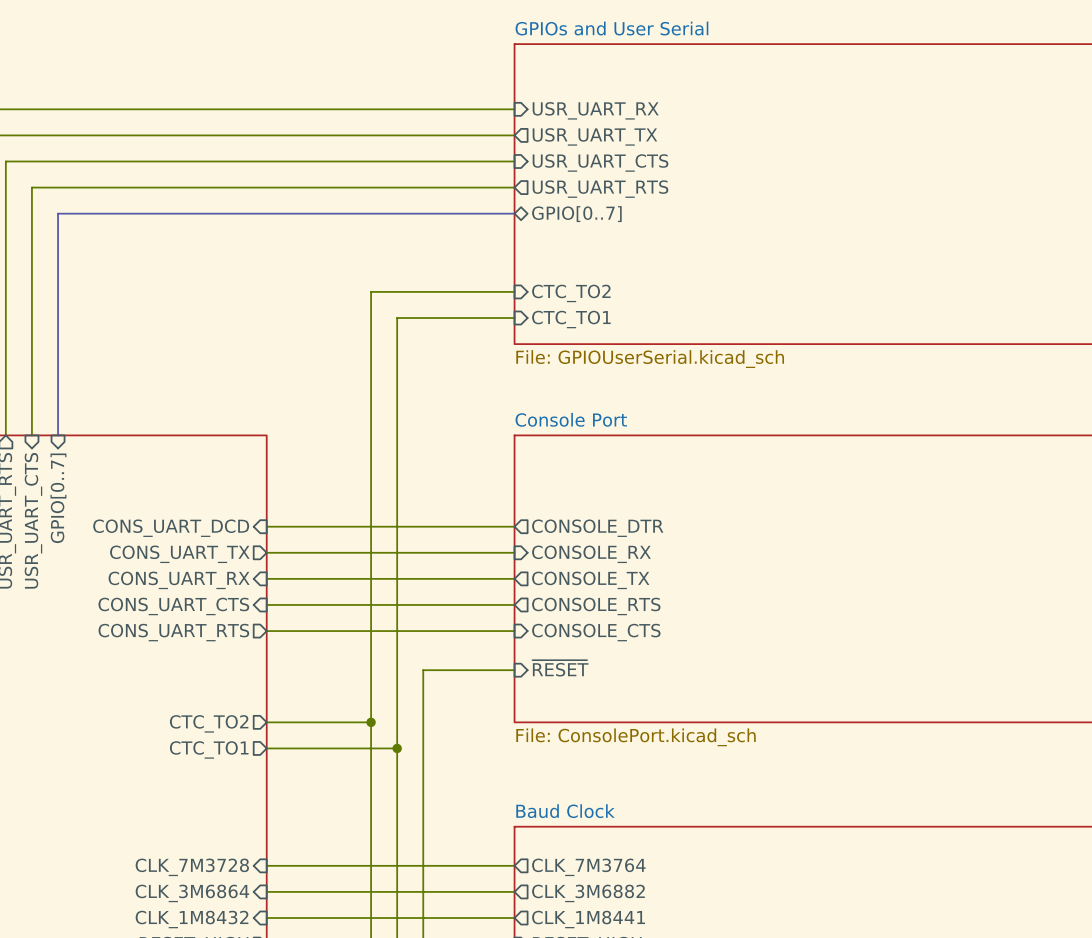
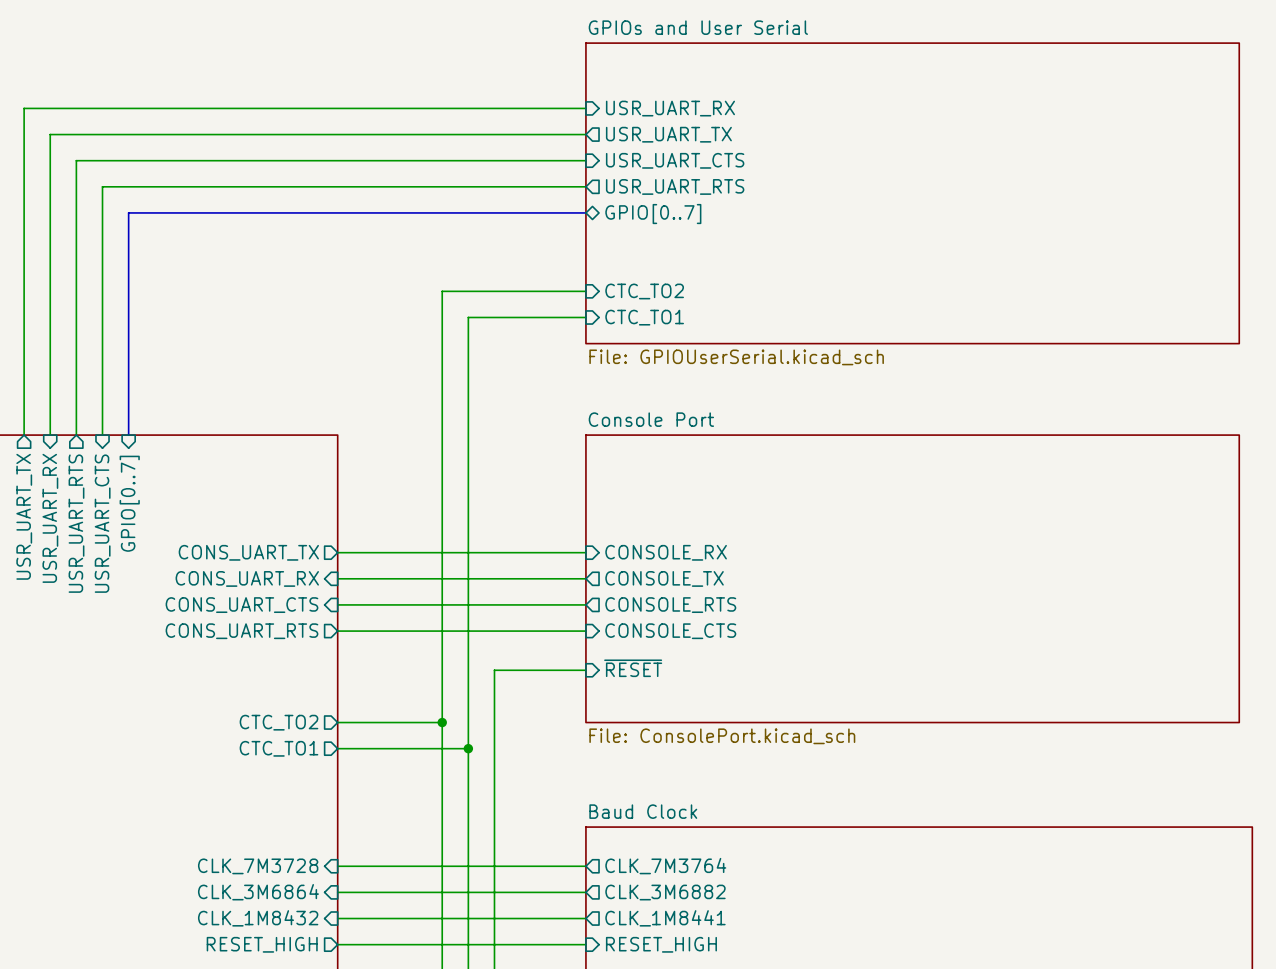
wire: (266, 526) (514, 526) -> none
sheet pin: CONS_UART_DCD (171, 528) -> none
sheet pin: CONSOLE_DTR (597, 528) -> none

